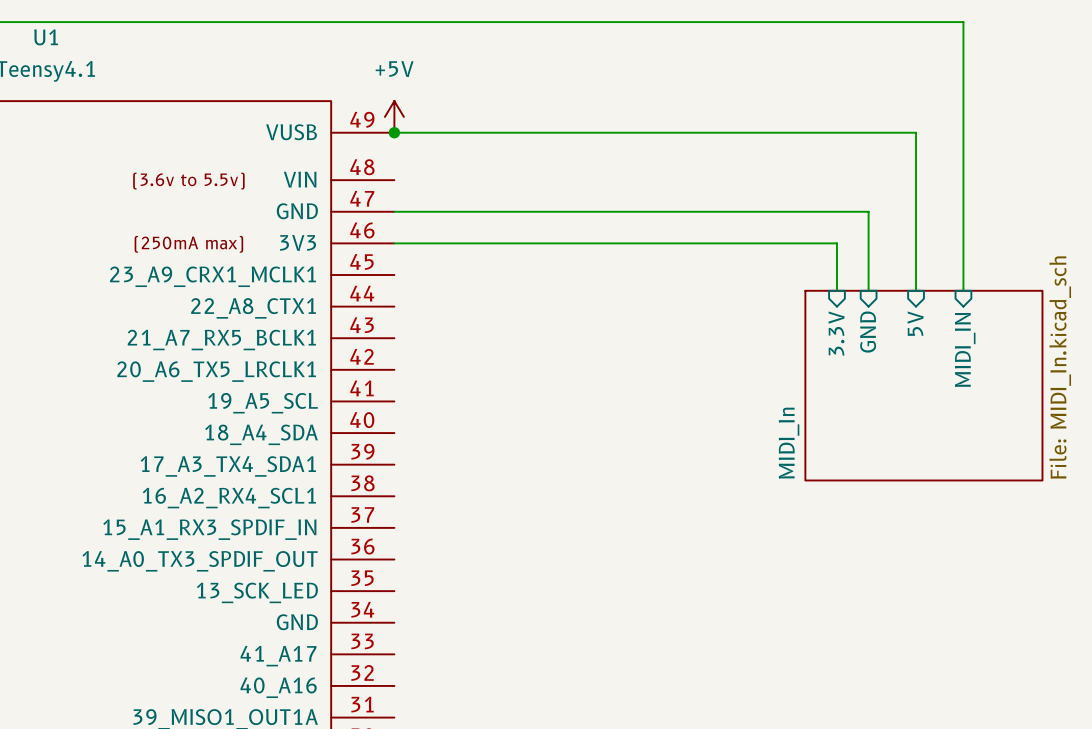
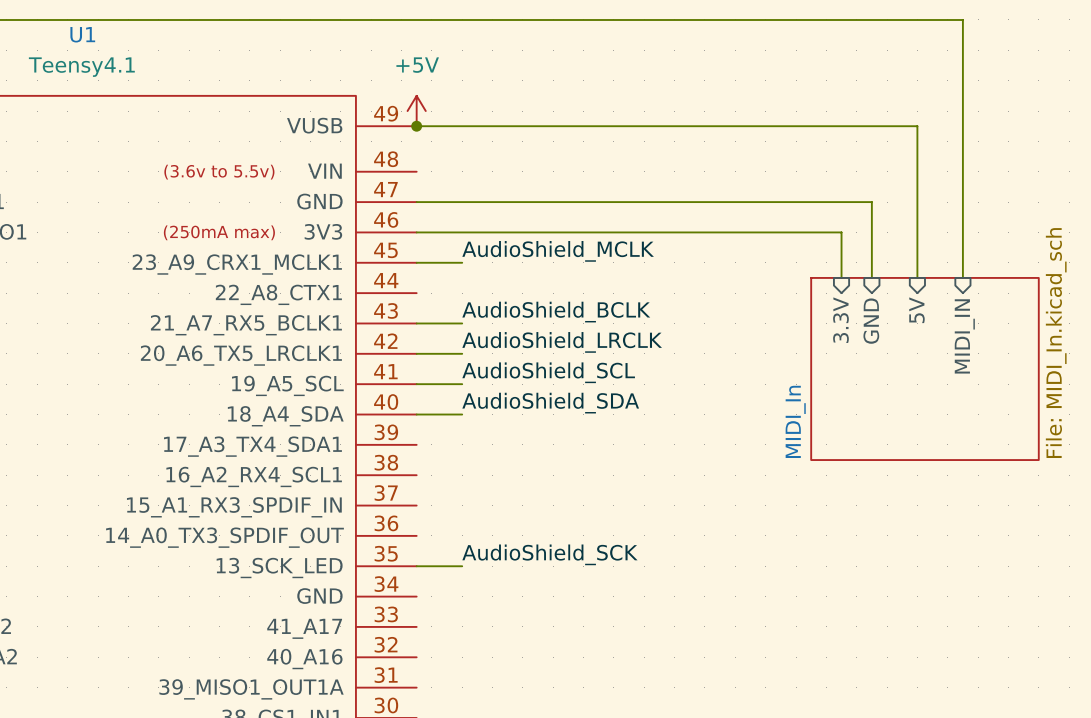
label: none -> AudioShield_MCLK (558, 251)
wire: none -> (416, 262) (462, 262)
label: none -> AudioShield_BCLK (556, 312)
wire: none -> (416, 323) (462, 323)
label: none -> AudioShield_LRCLK (562, 342)
wire: none -> (416, 353) (462, 353)
label: none -> AudioShield_SCL (548, 372)
wire: none -> (416, 384) (462, 384)
label: none -> AudioShield_SDA (550, 403)
wire: none -> (416, 414) (462, 414)
label: none -> AudioShield_SCK (549, 554)
wire: none -> (416, 566) (462, 566)

